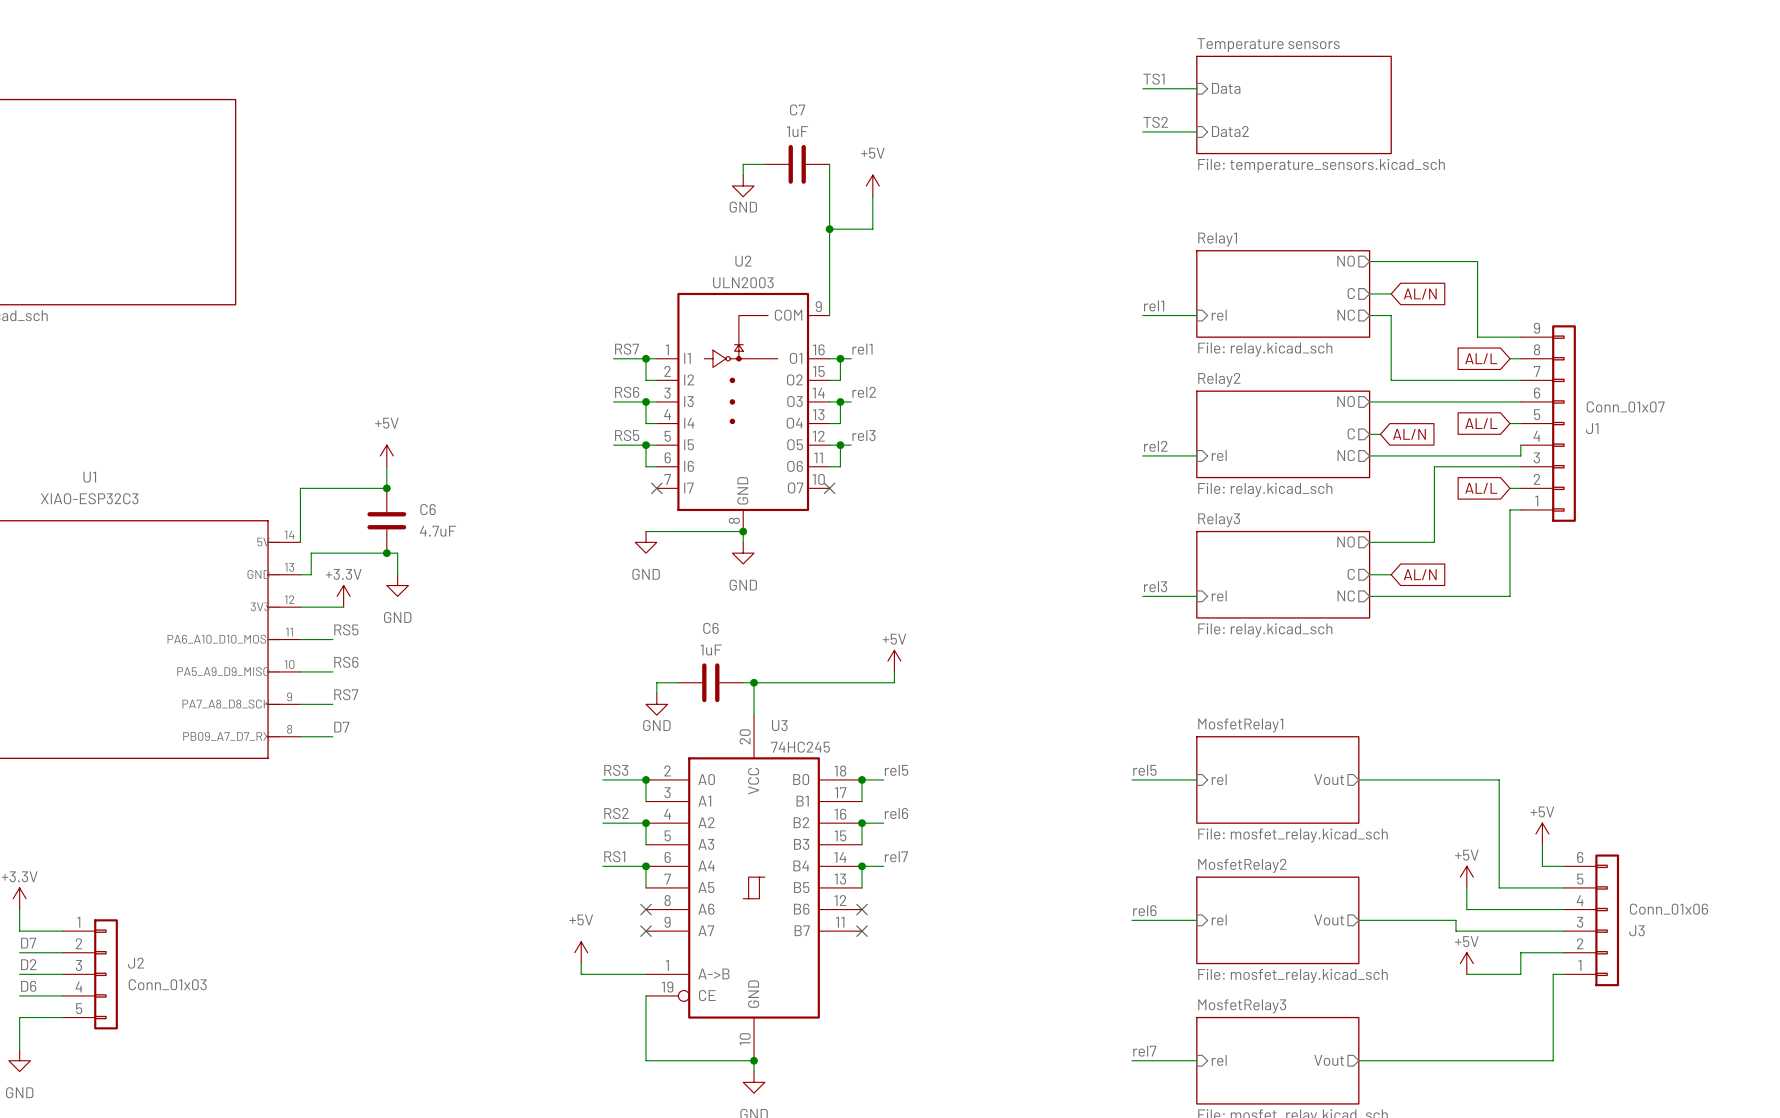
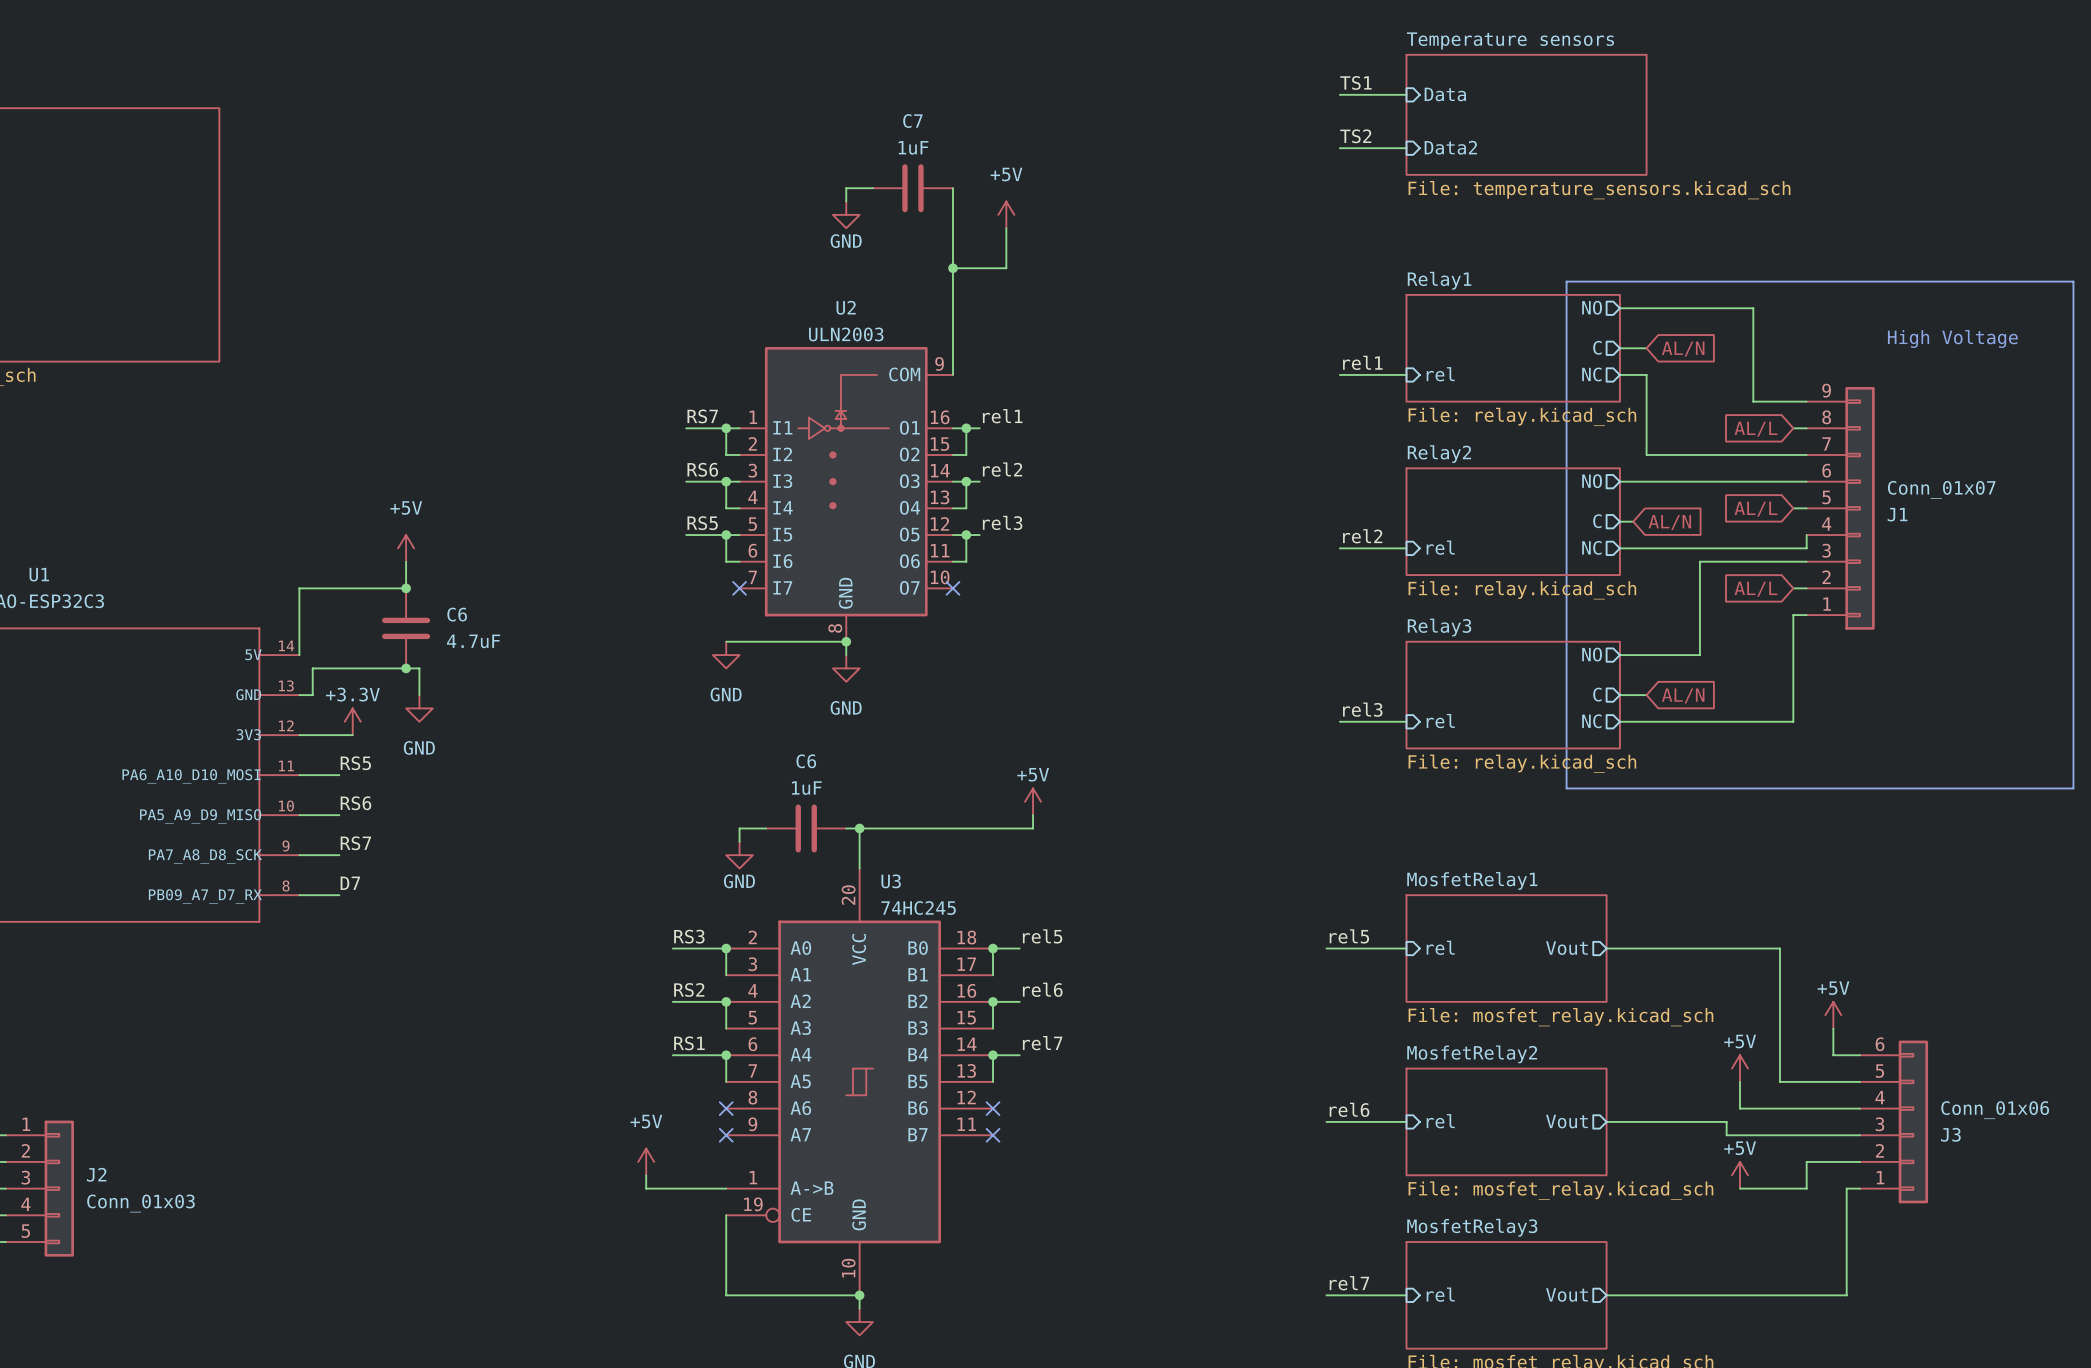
line: none -> (1566, 281) (2073, 281) (2073, 788) (1566, 788) (1566, 281)
text: none -> High Voltage (1952, 338)

